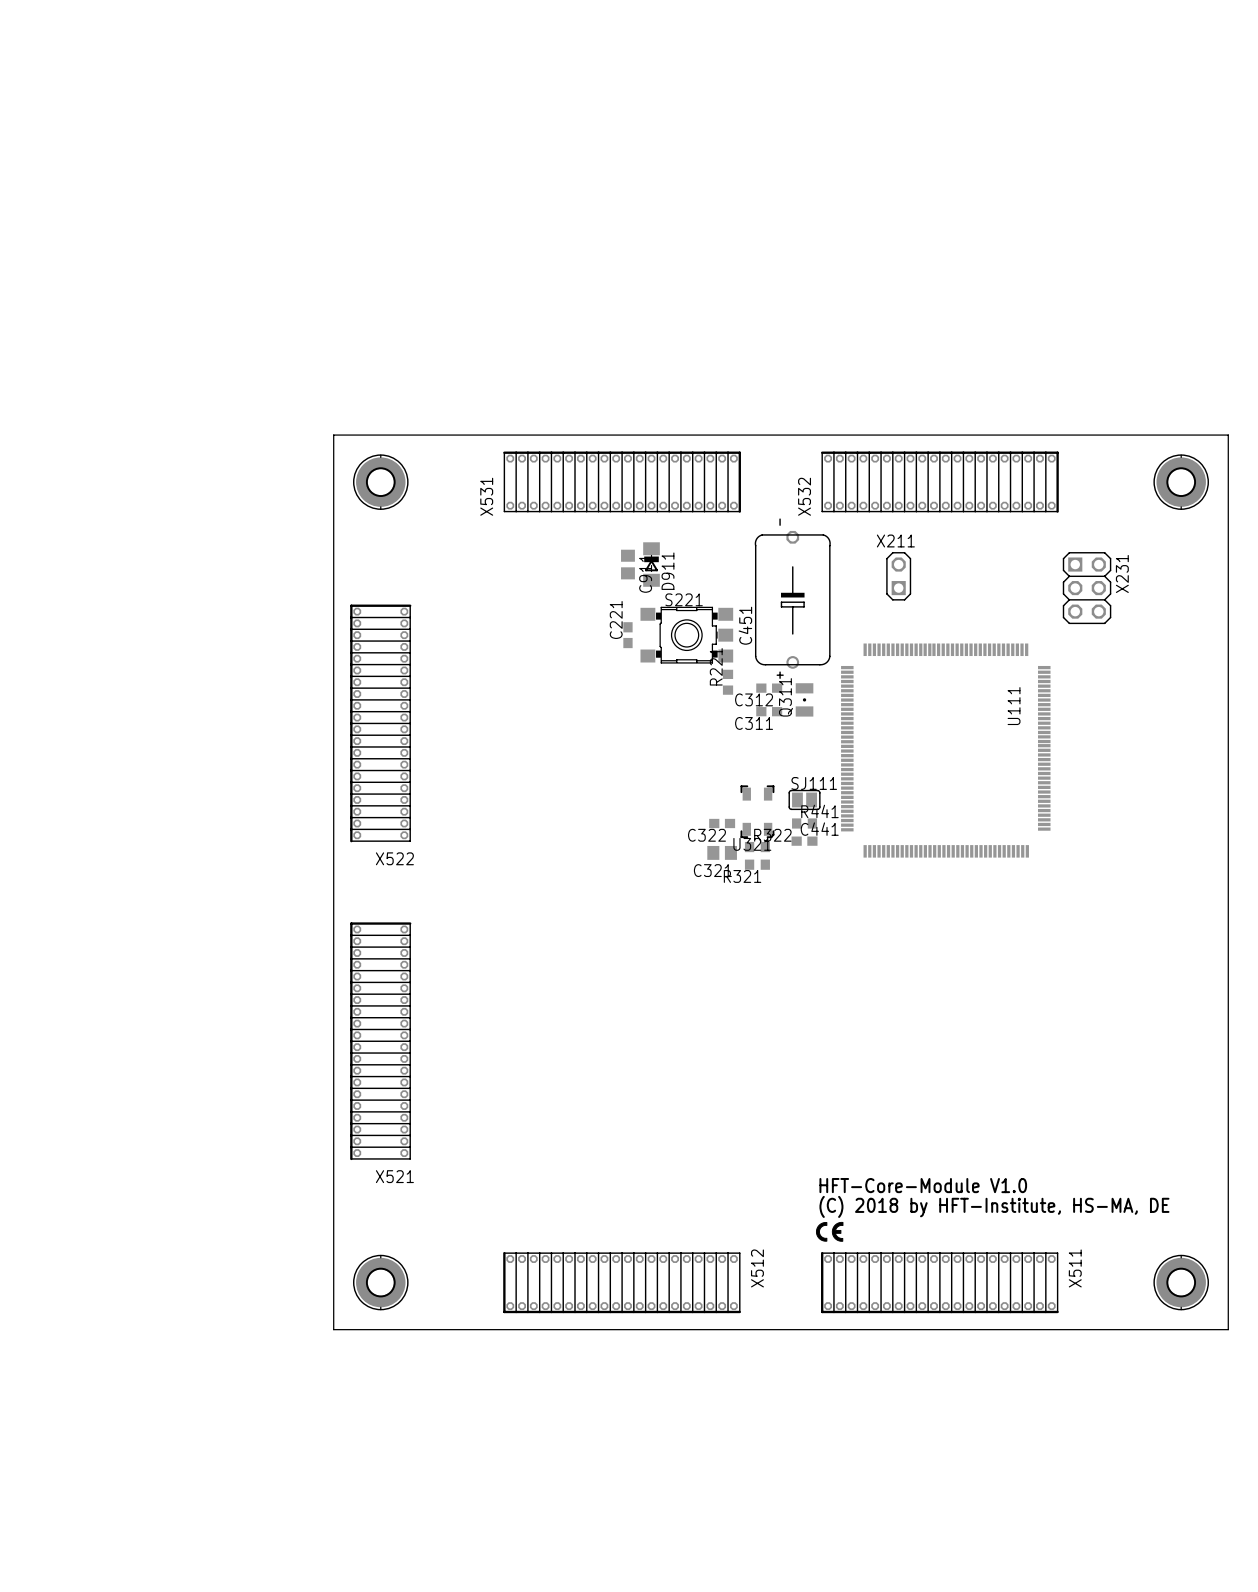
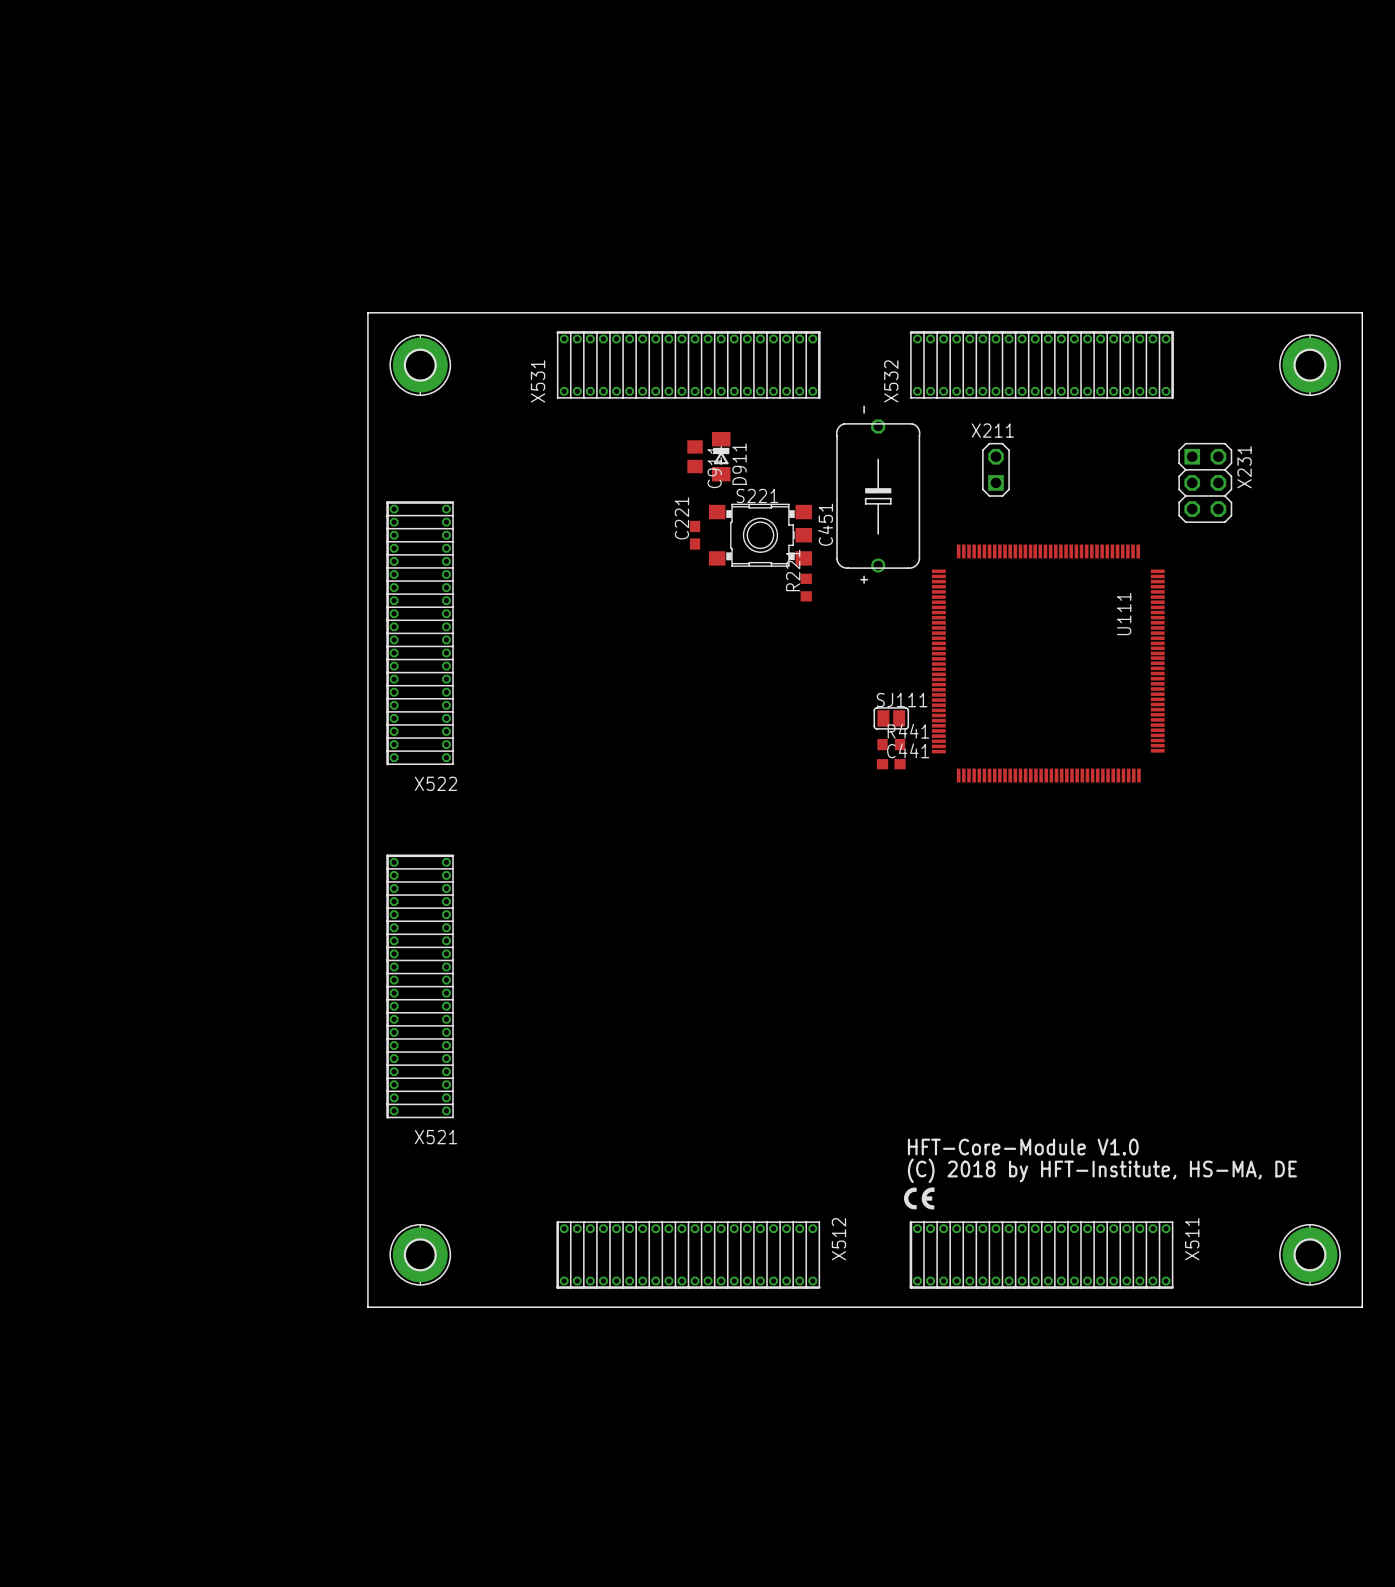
C312: (769, 688) -> none
Q311: (804, 699) -> none
C311: (769, 711) -> none
U321: (757, 811) -> none
C322: (722, 823) -> none
R322: (757, 847) -> none
C321: (722, 852) -> none
R321: (757, 864) -> none

